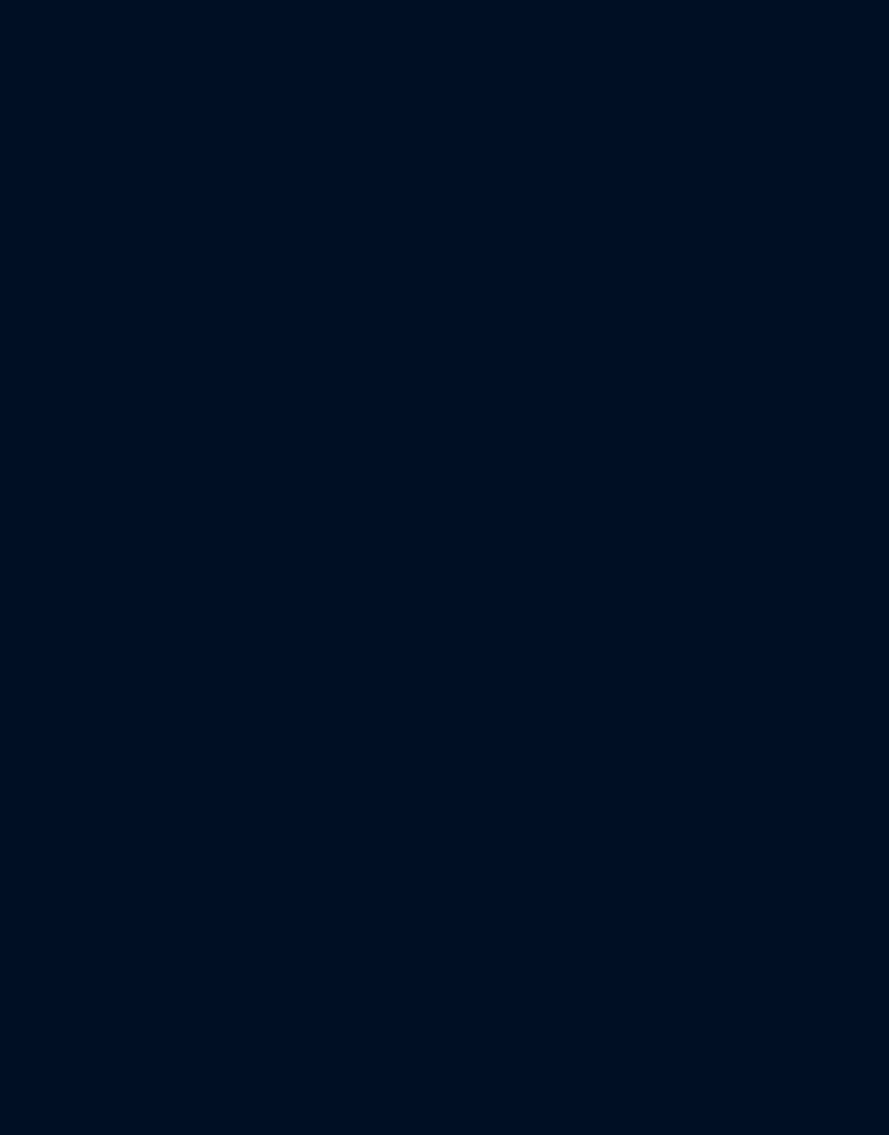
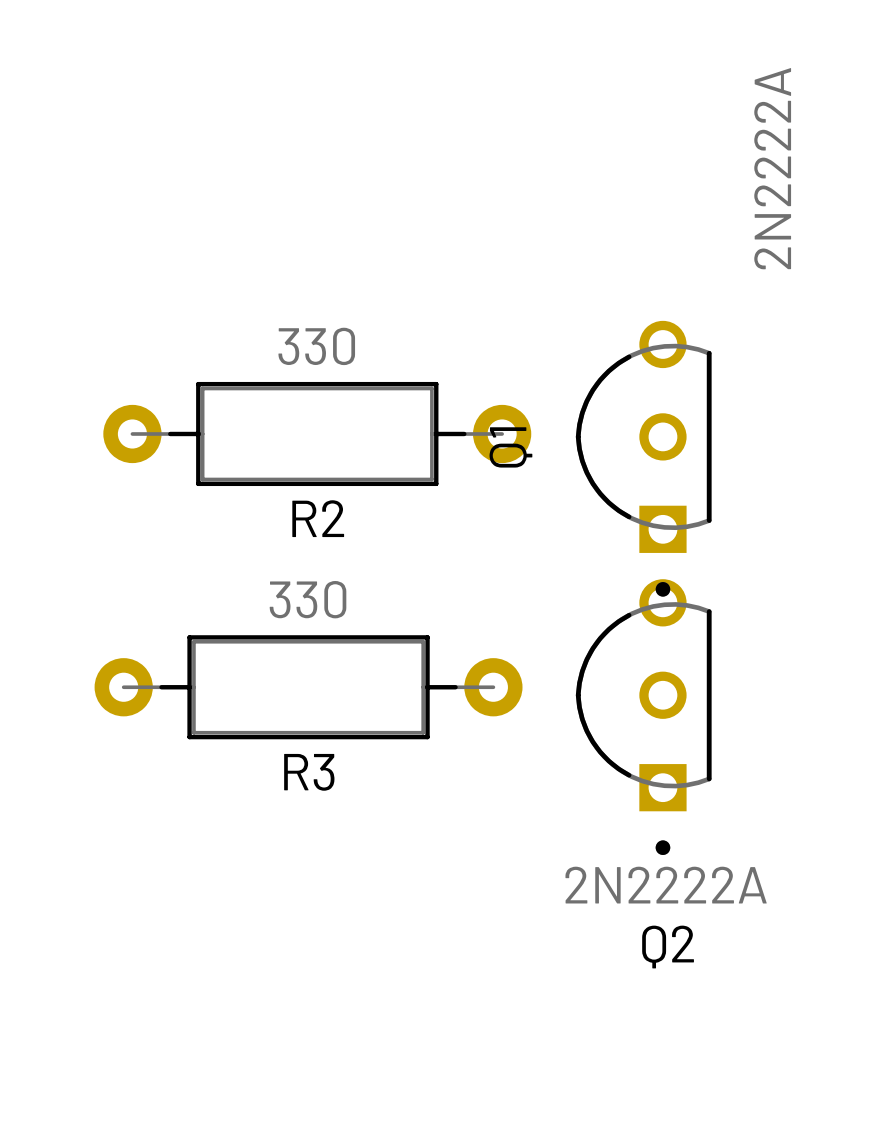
R2: none -> 330 (317, 433)
Q1: none -> 2N2222A (643, 458)
R3: none -> 330 (308, 687)
Q2: none -> 2N2222A (643, 717)

